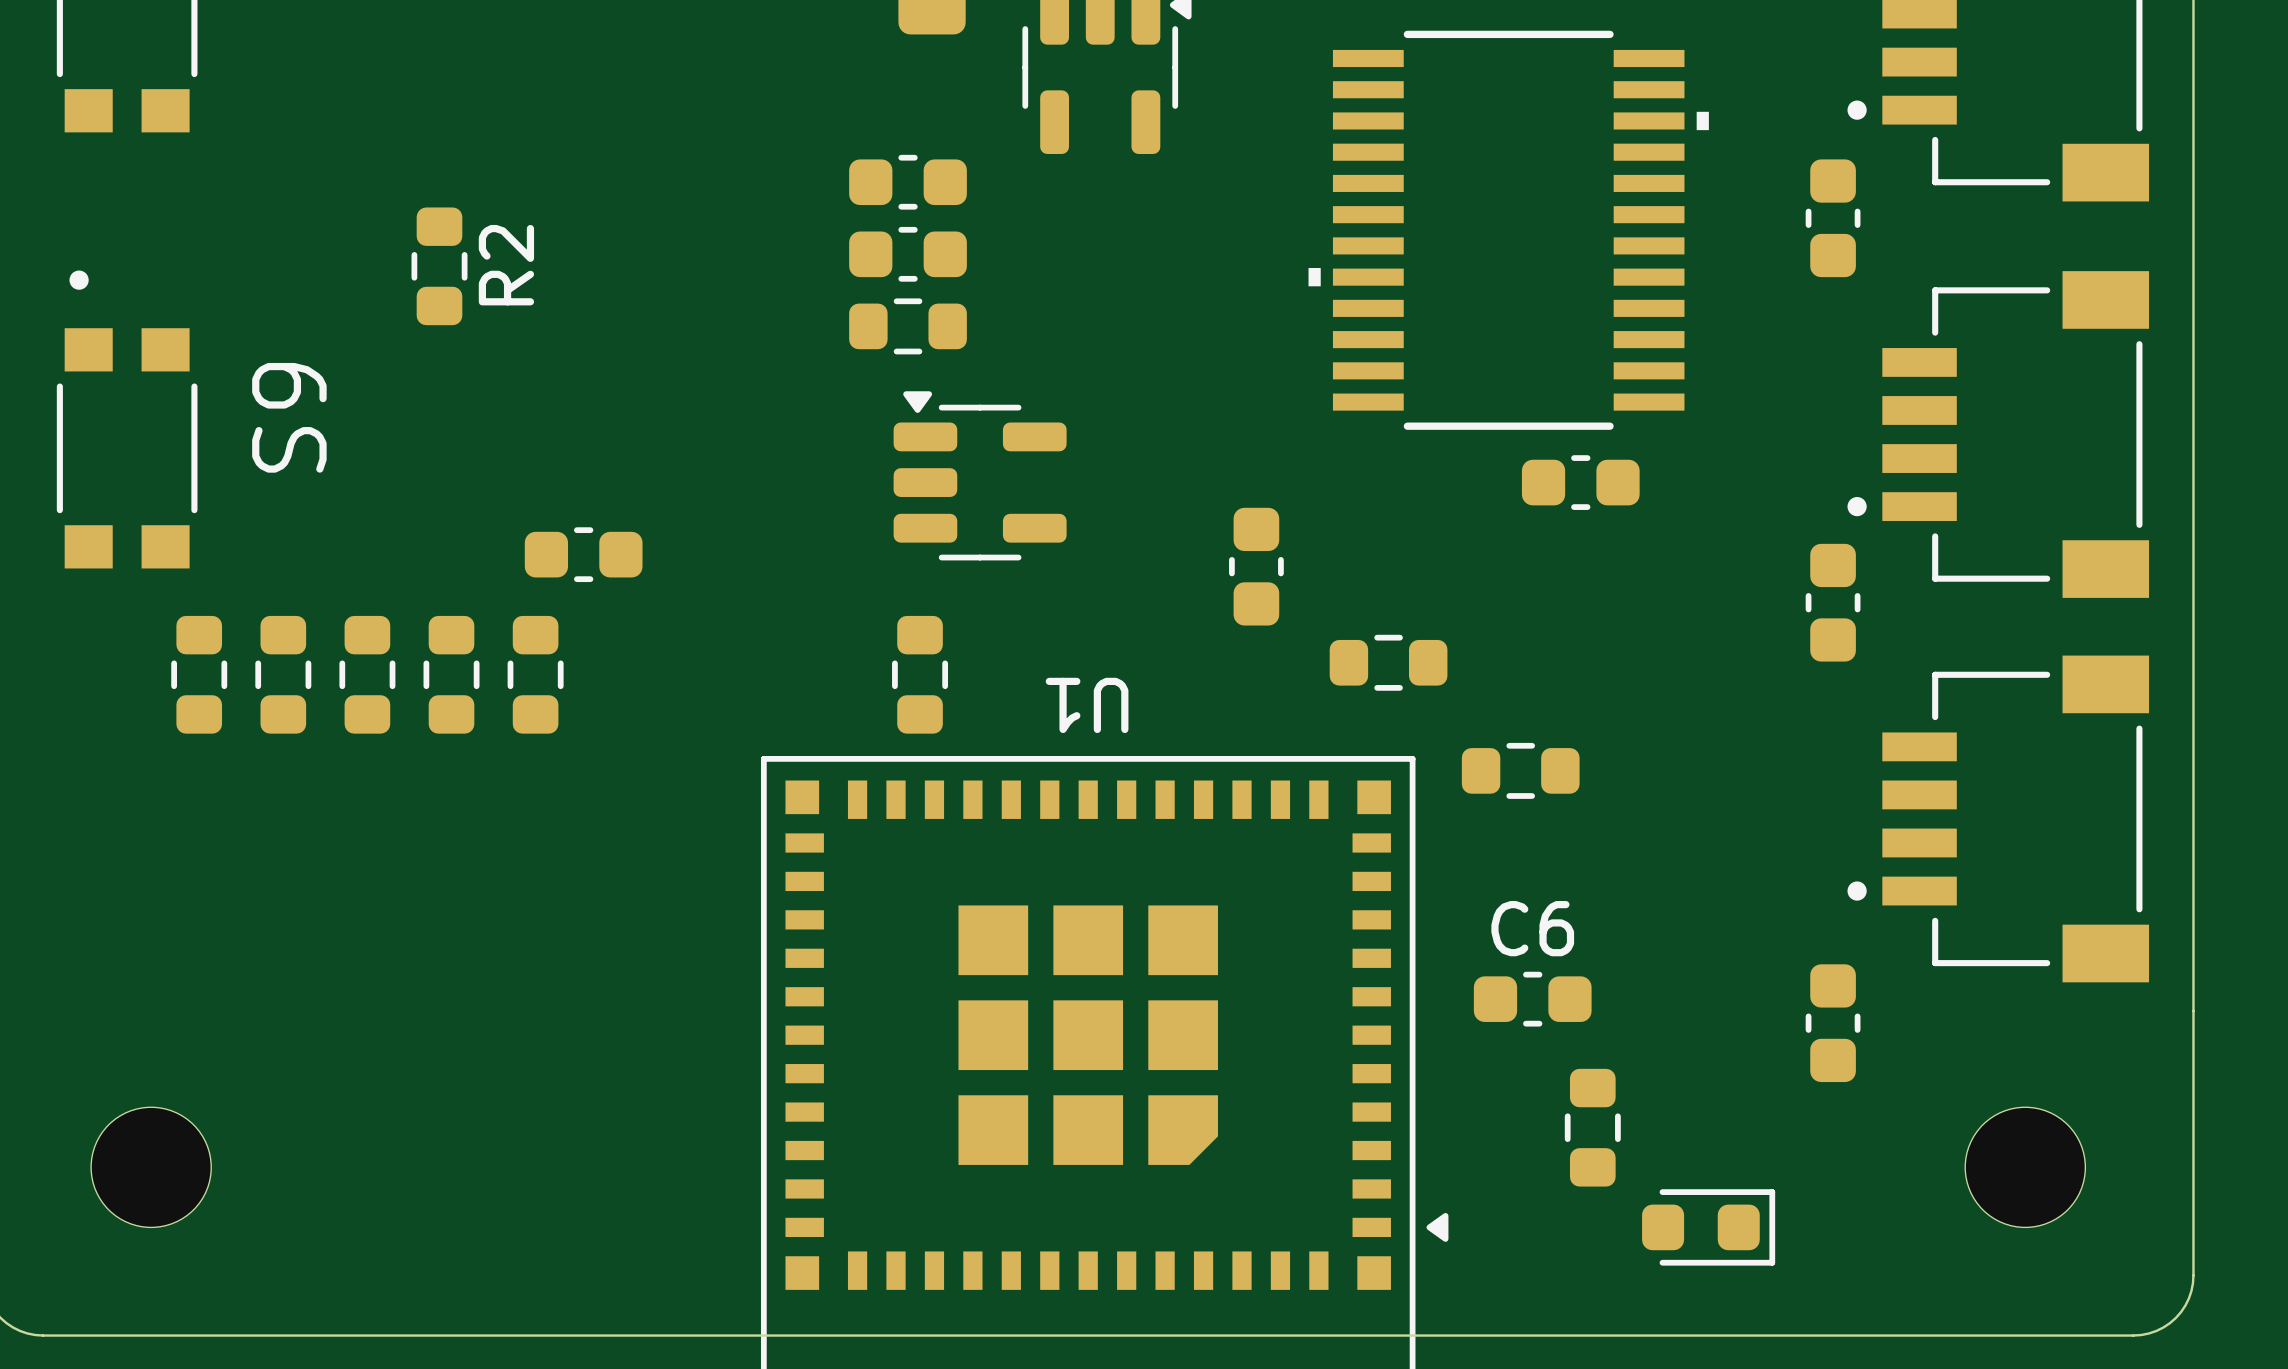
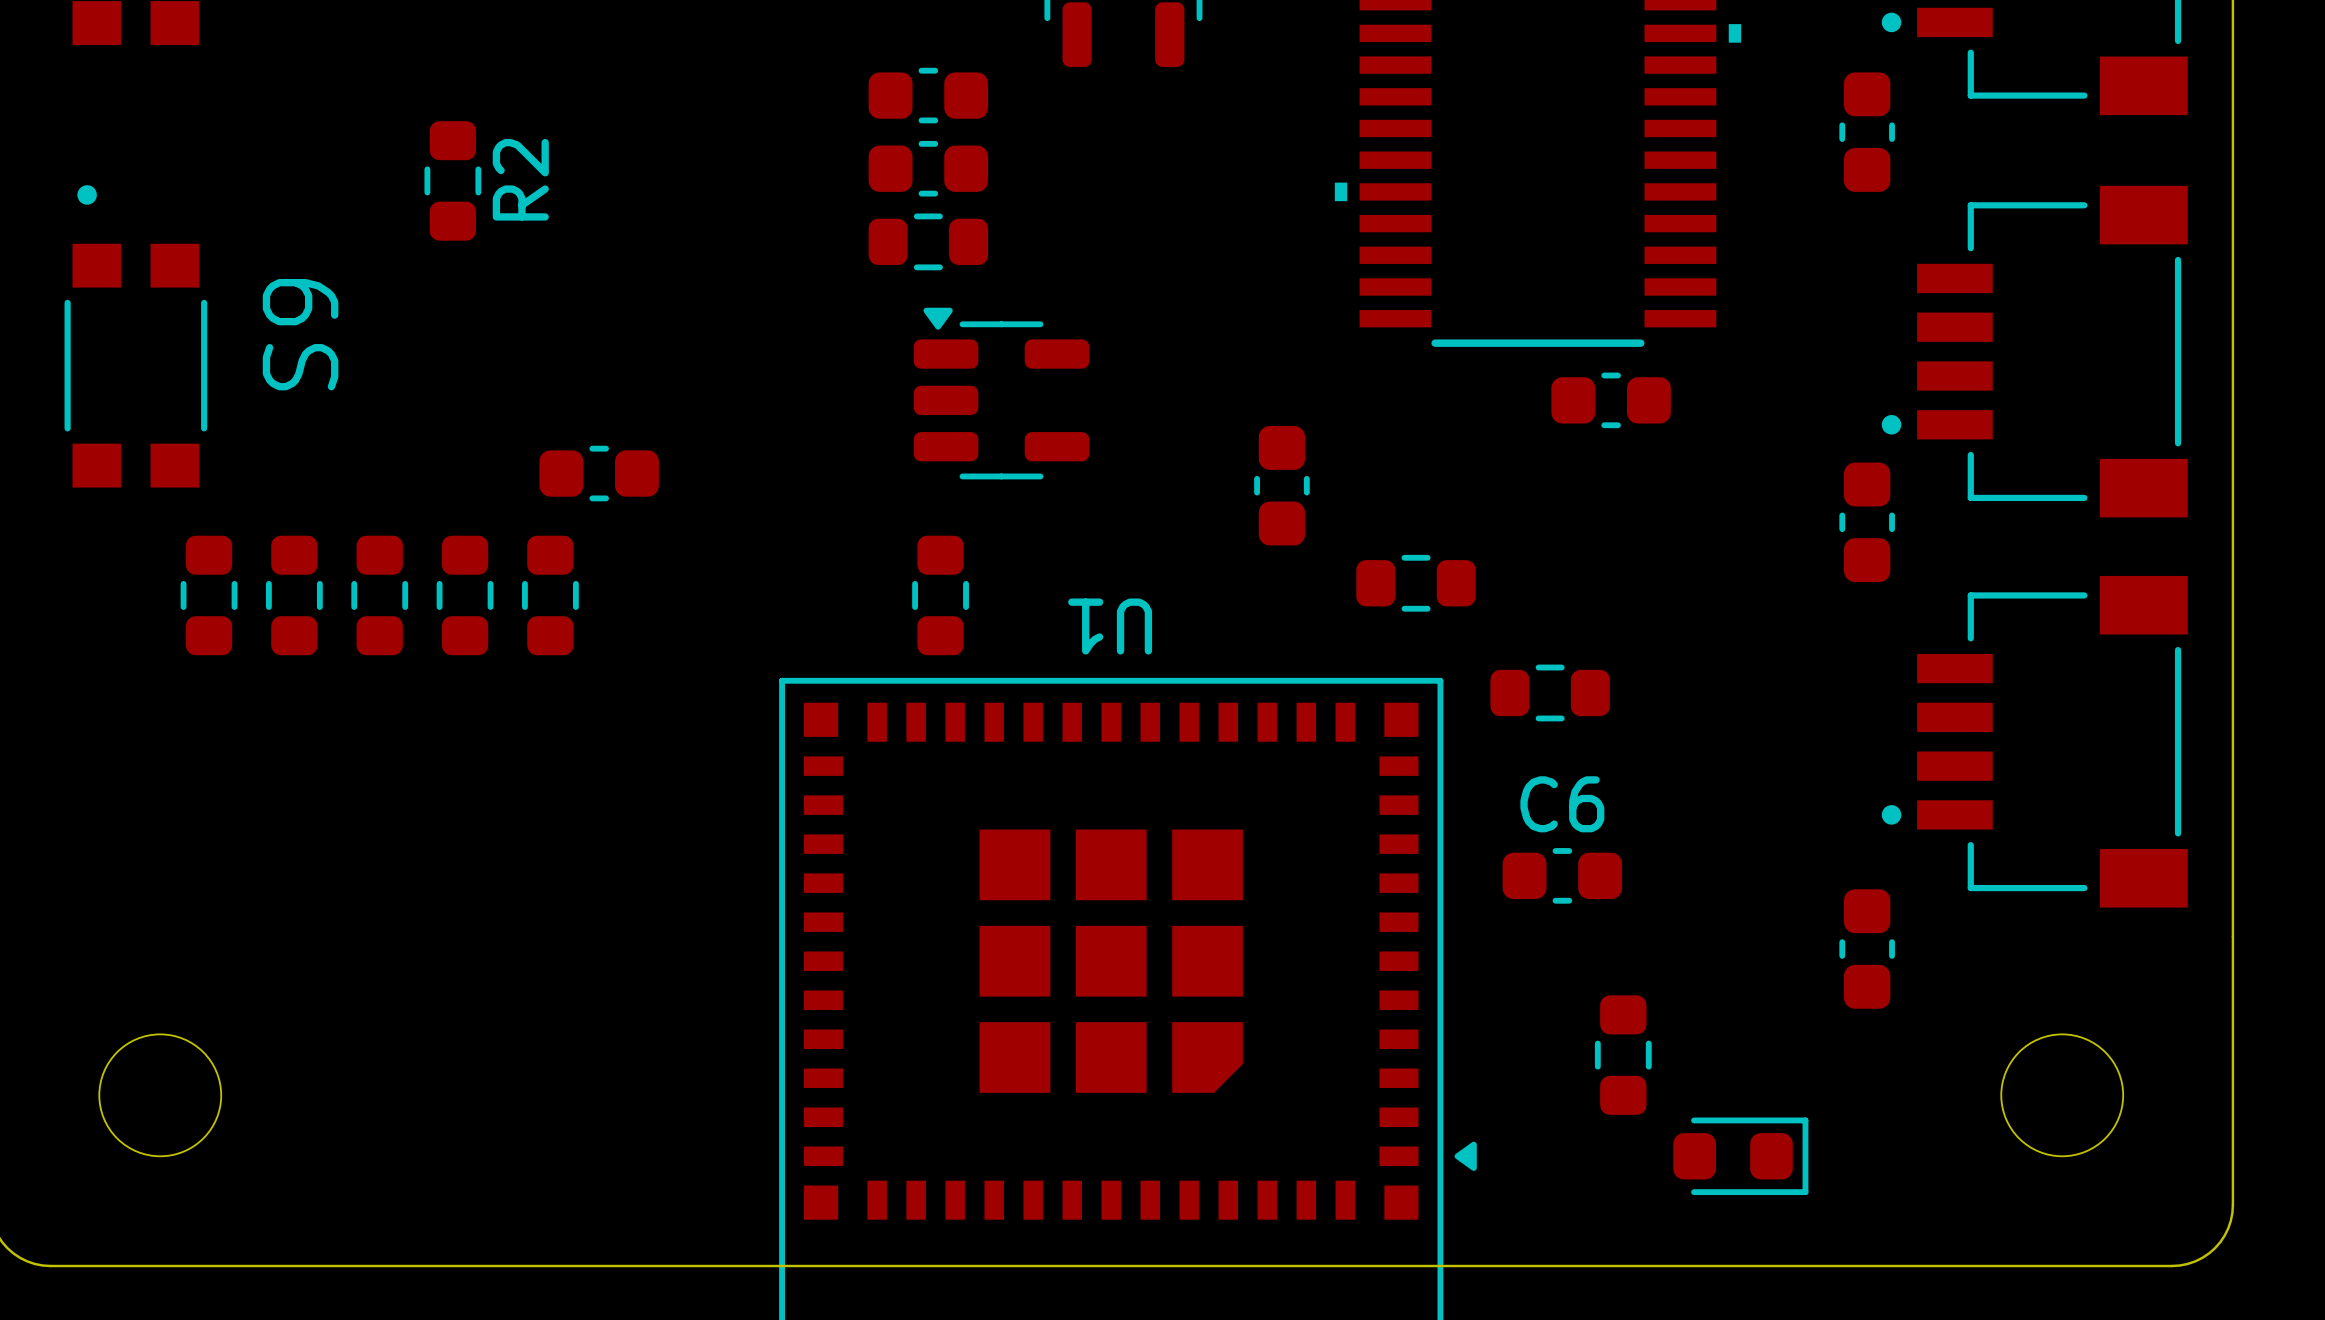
C6 position: (1532, 999) -> (1562, 875)

